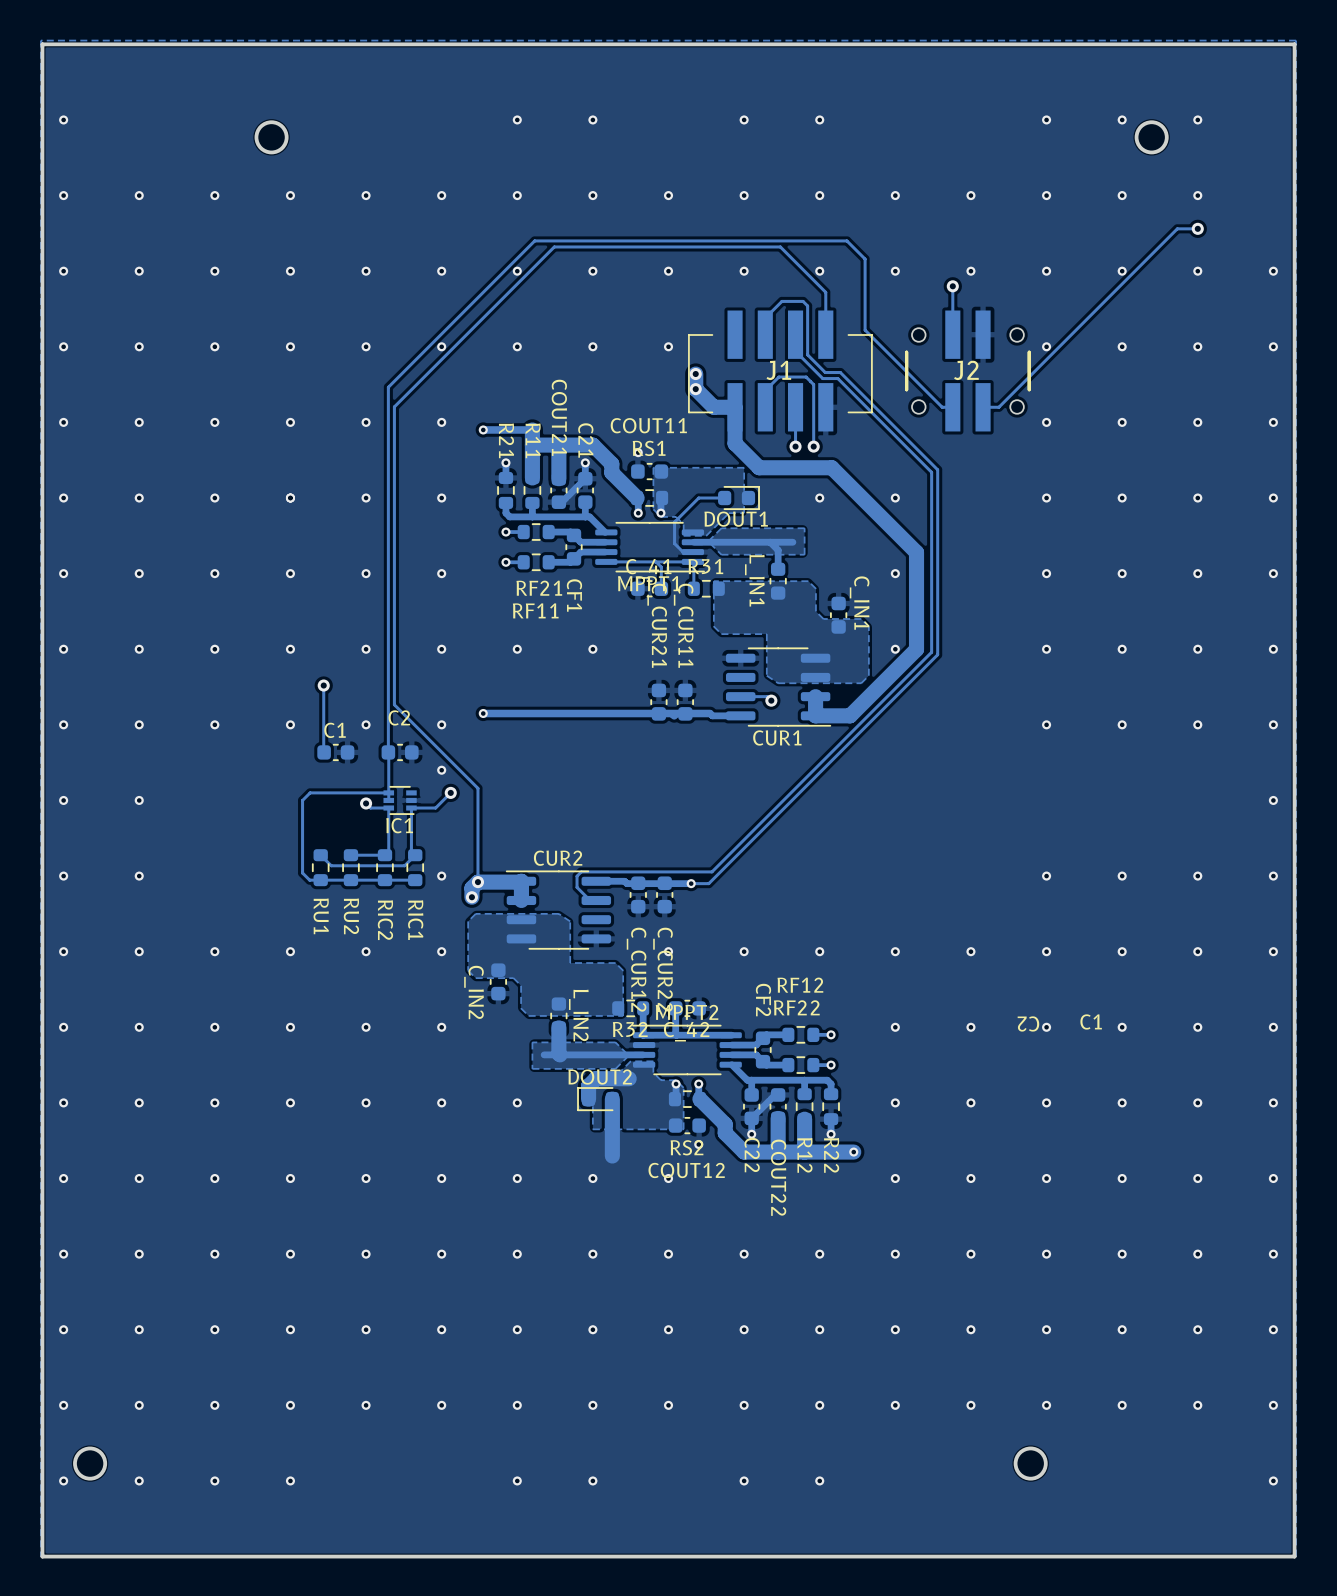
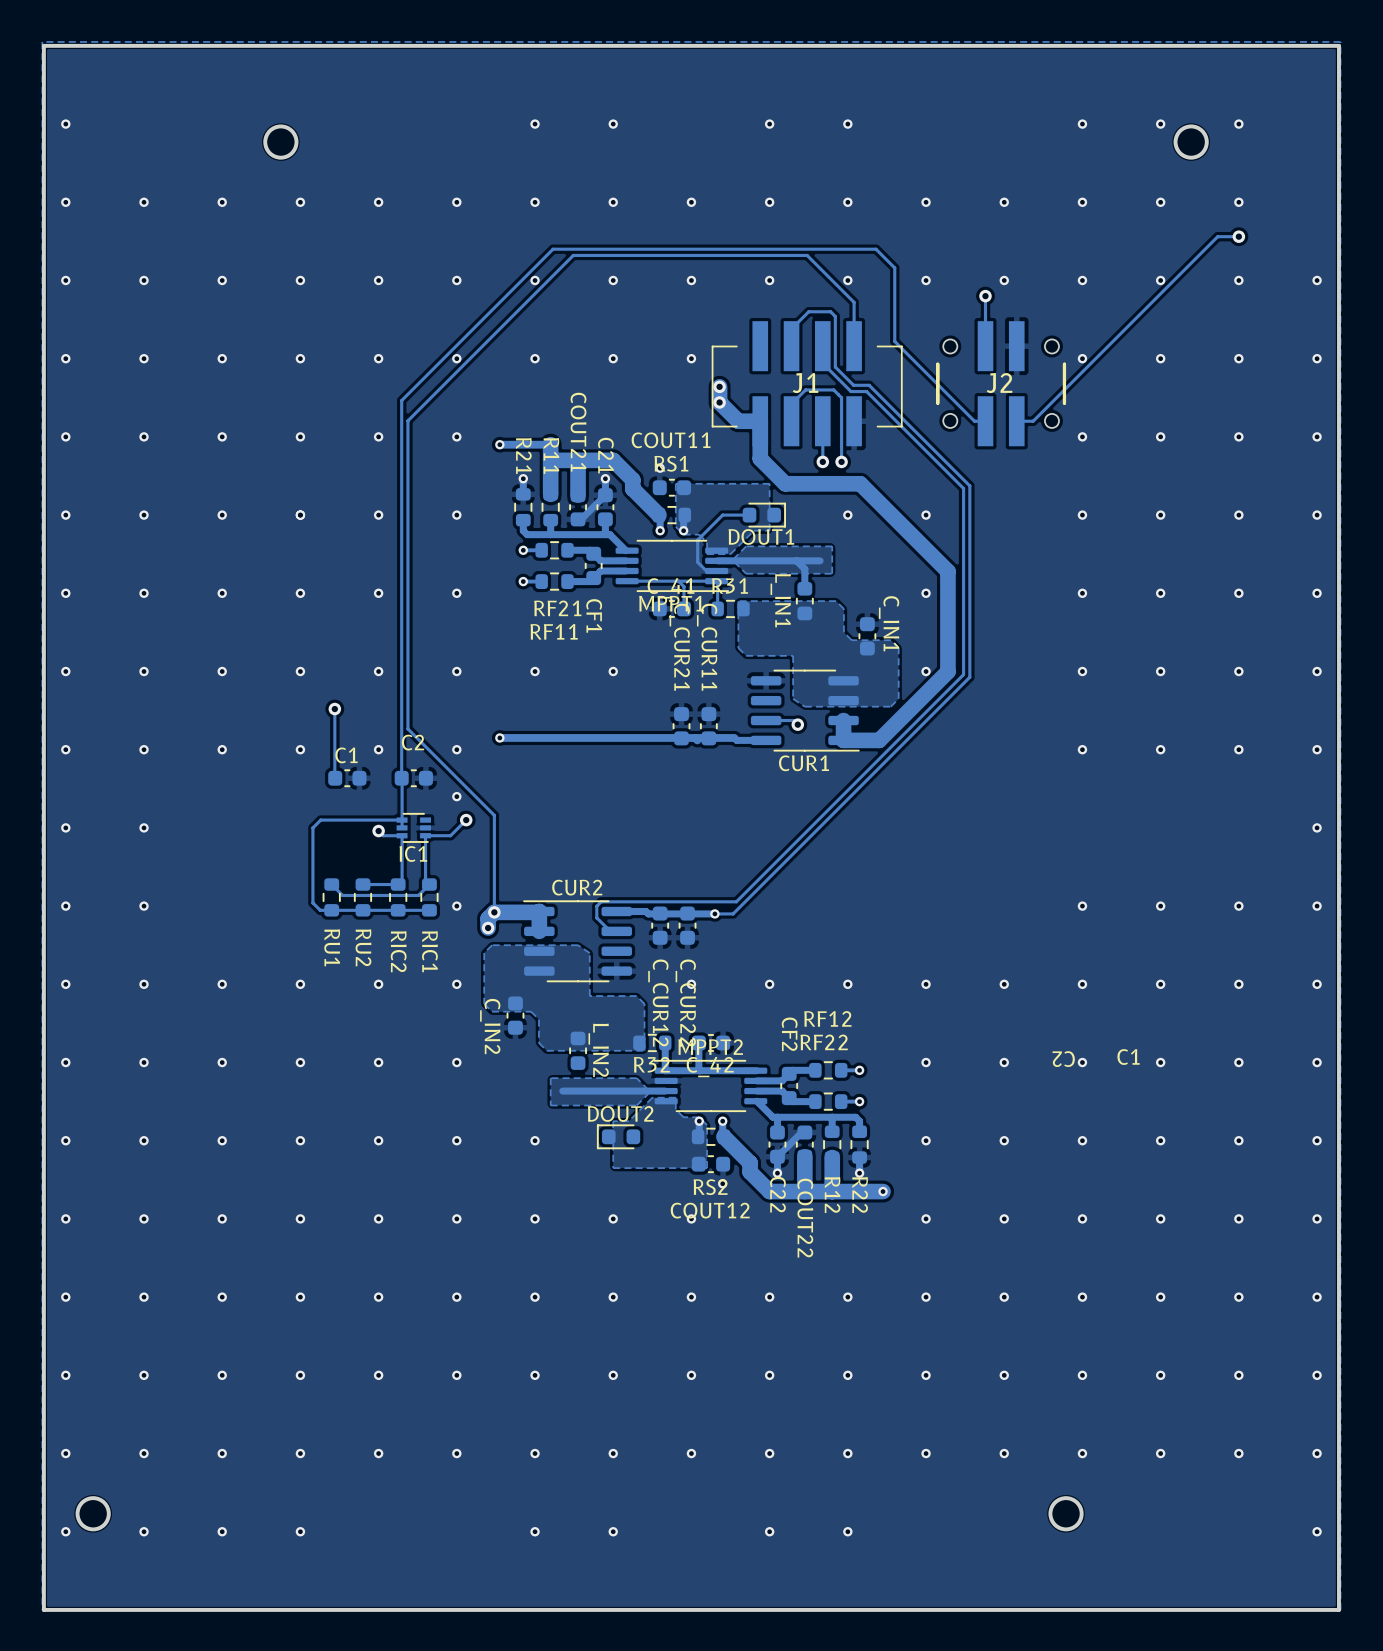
track: (558, 1027) (560, 1054) -> none
track: (629, 1078) (595, 1078) (588, 1086) (588, 1099) -> none
track: (612, 1099) (612, 1156) -> none

